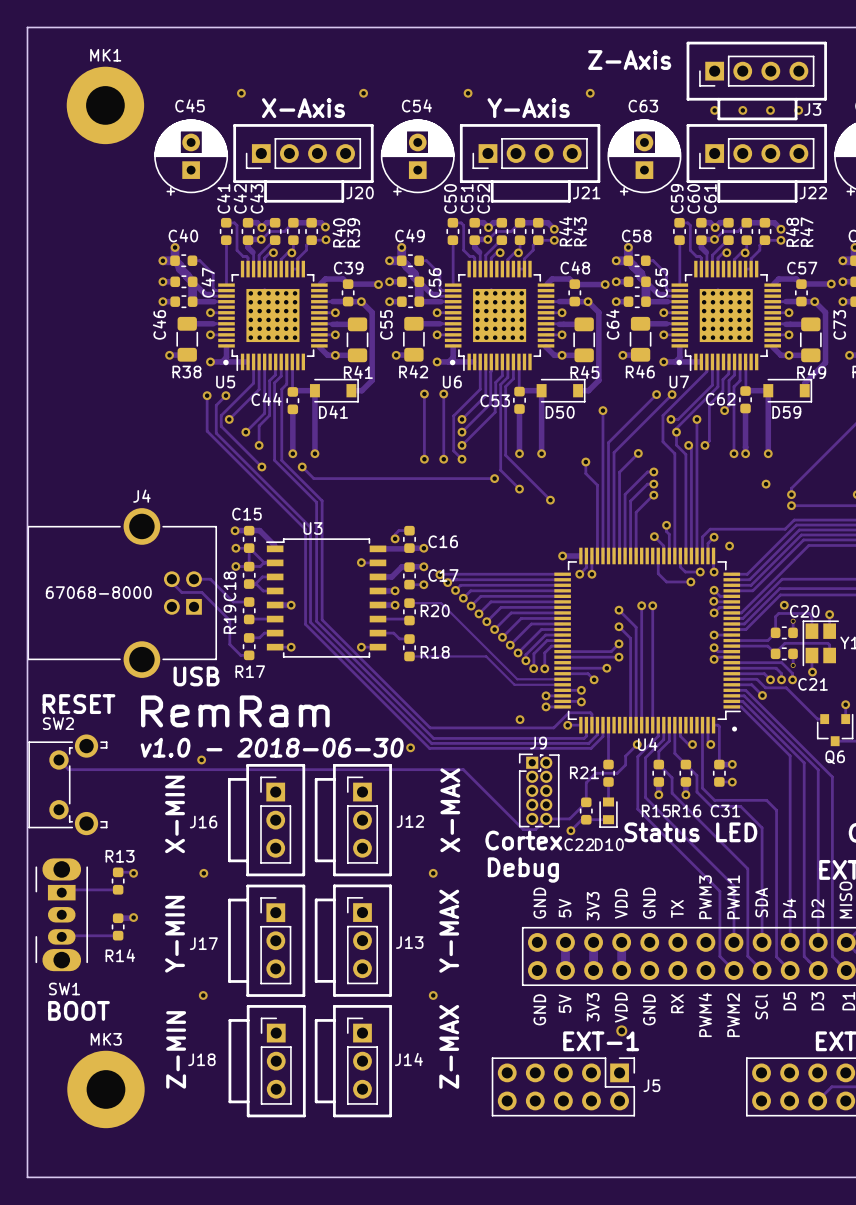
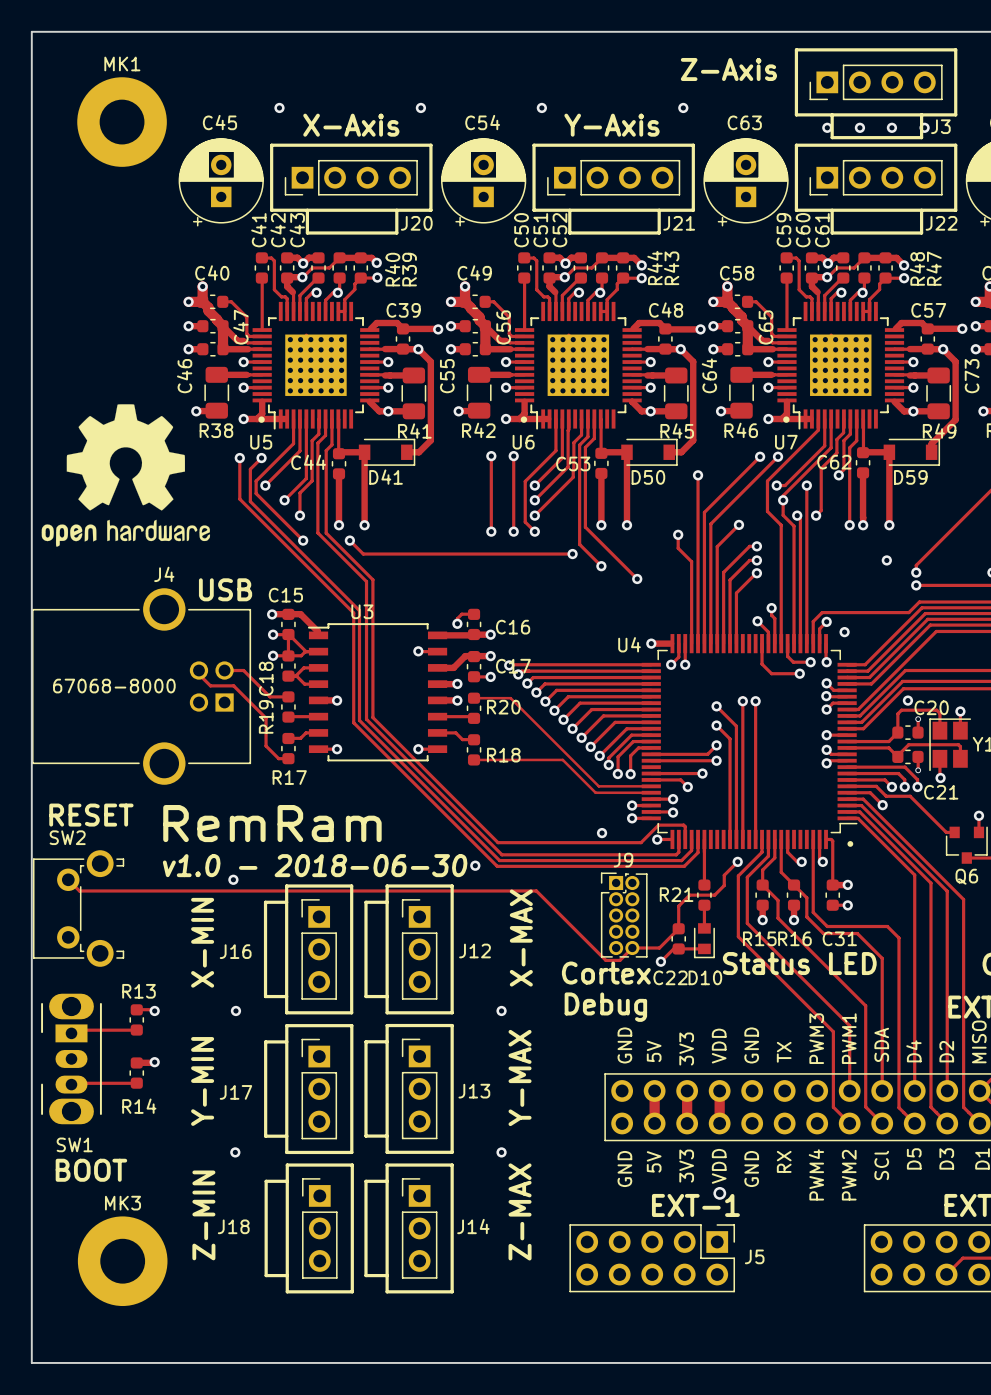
drawing: none -> [41, 404, 211, 547]
text position: USB (196, 676) -> USB (225, 589)
U4 name position: U4 (647, 744) -> U4 (629, 644)

